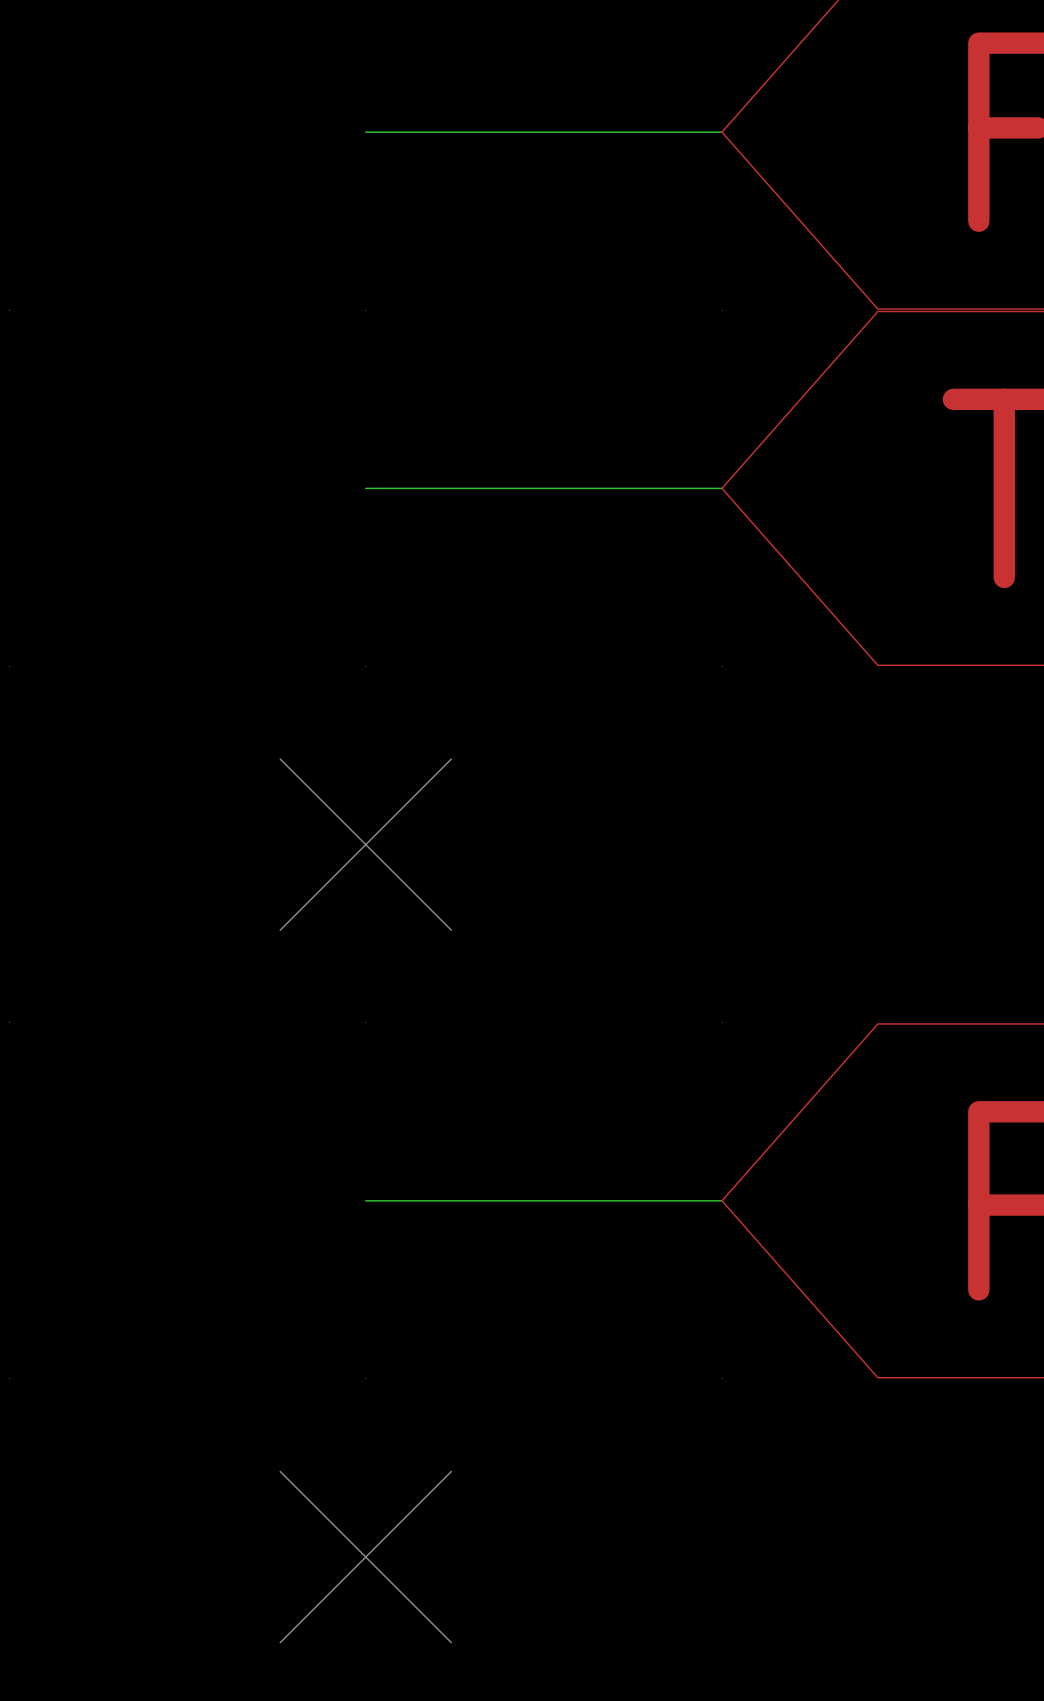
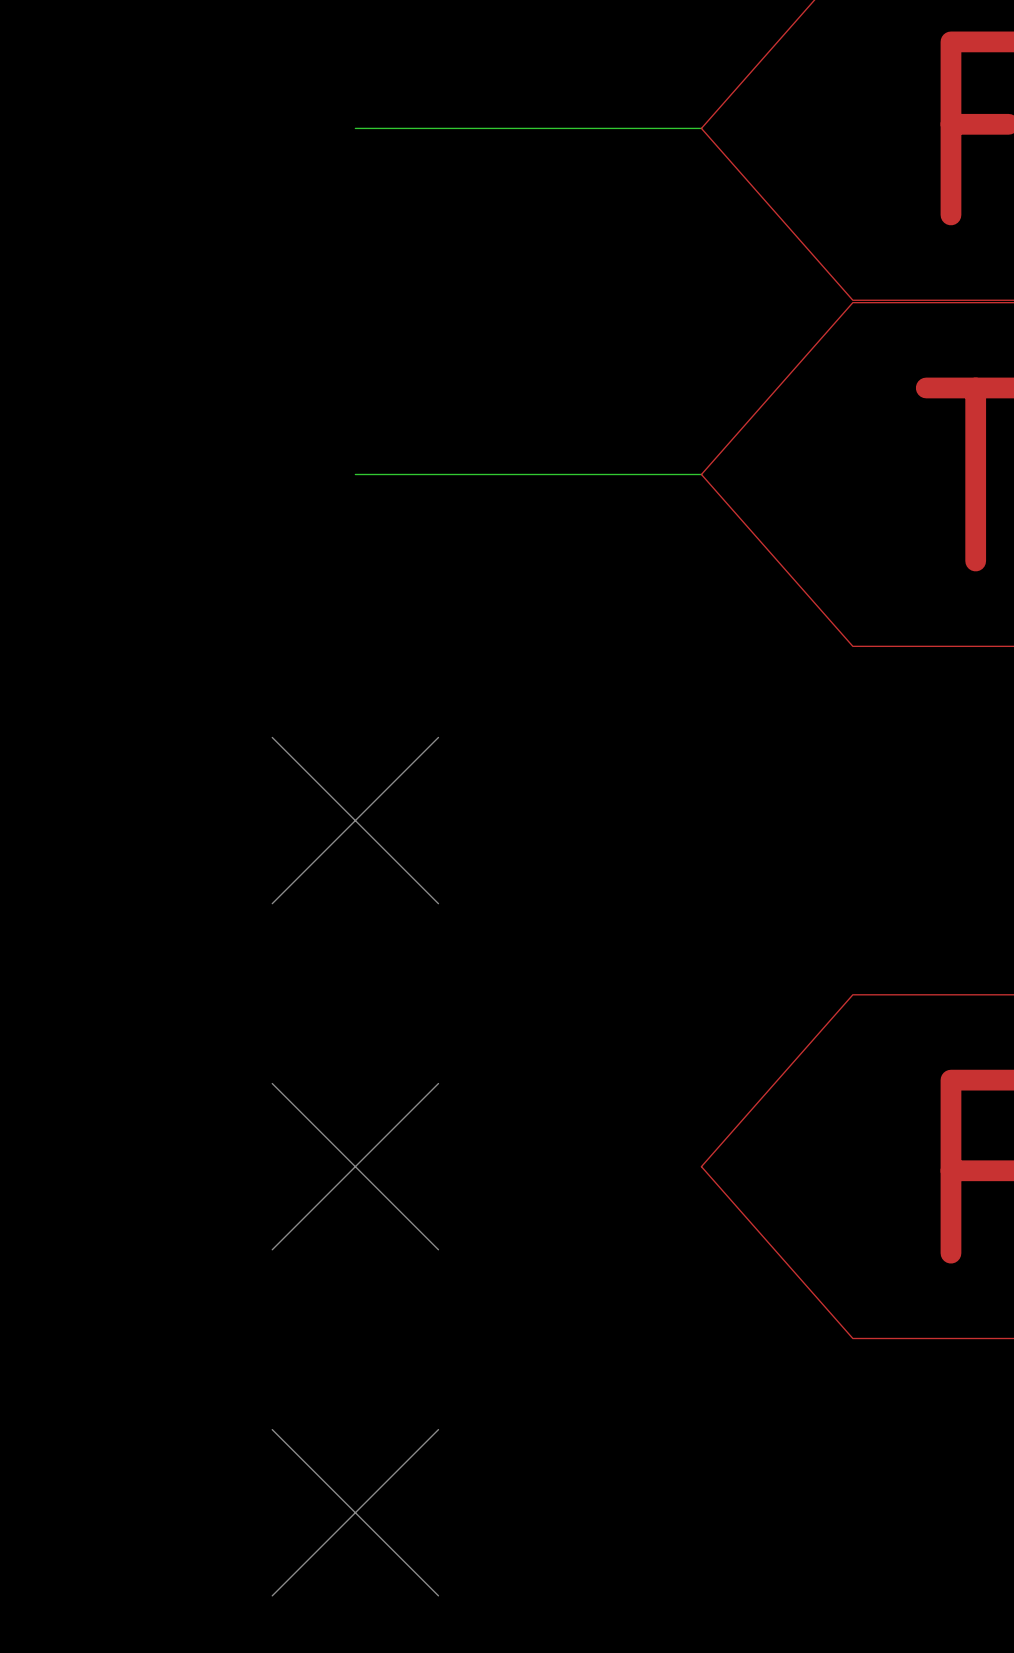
wire: (365, 1200) (722, 1200) -> none
no-connect mark: none -> (355, 1166)

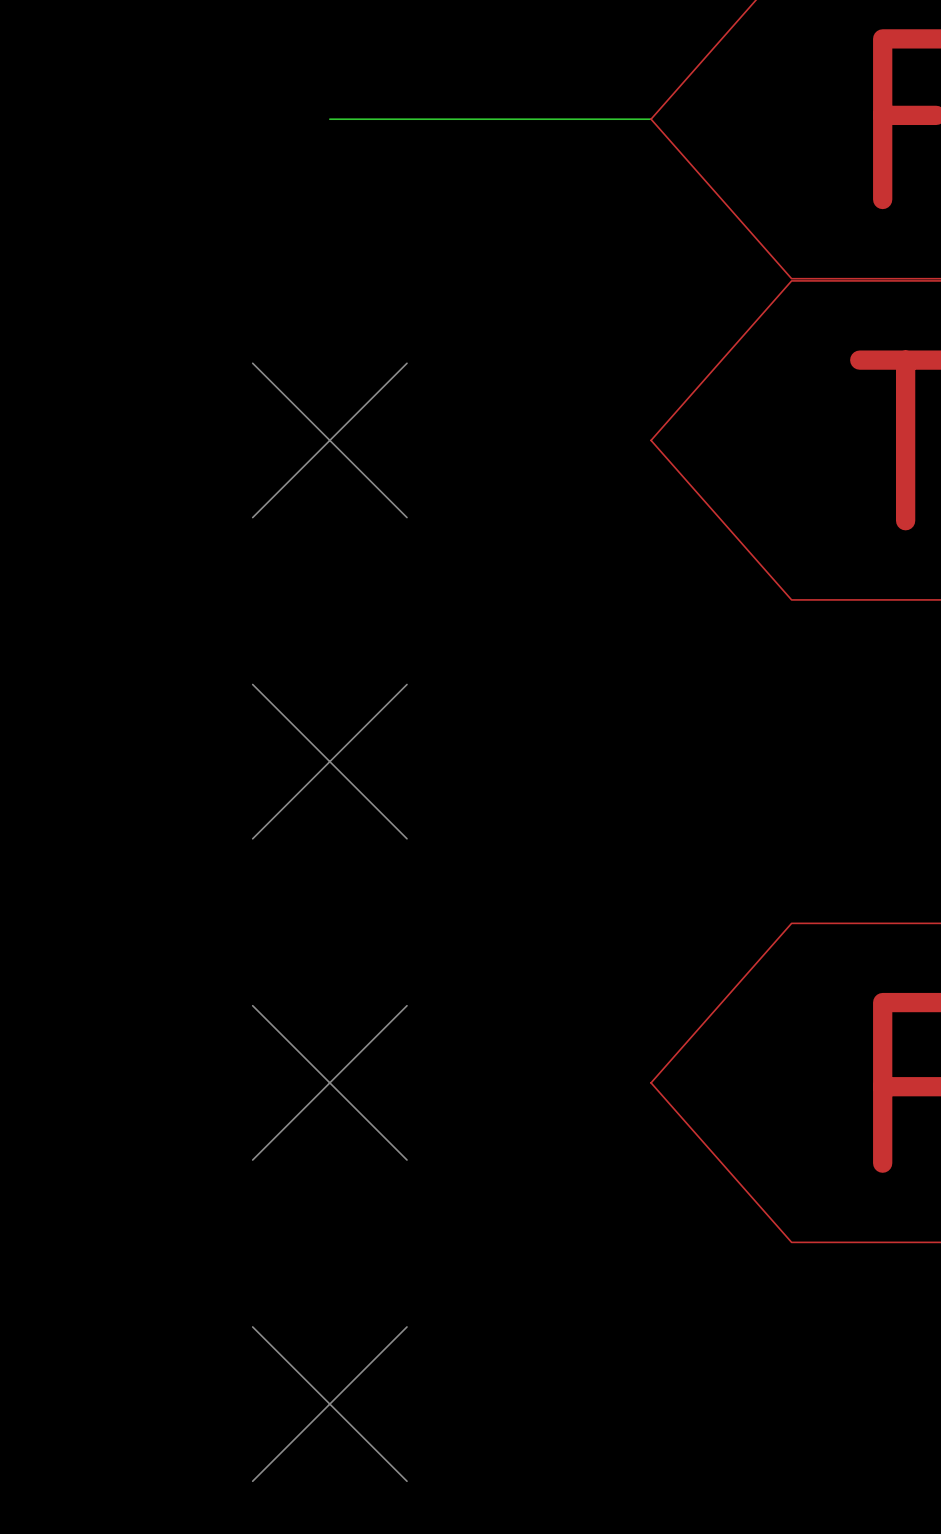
wire: (355, 474) (701, 474) -> none
no-connect mark: none -> (329, 440)

